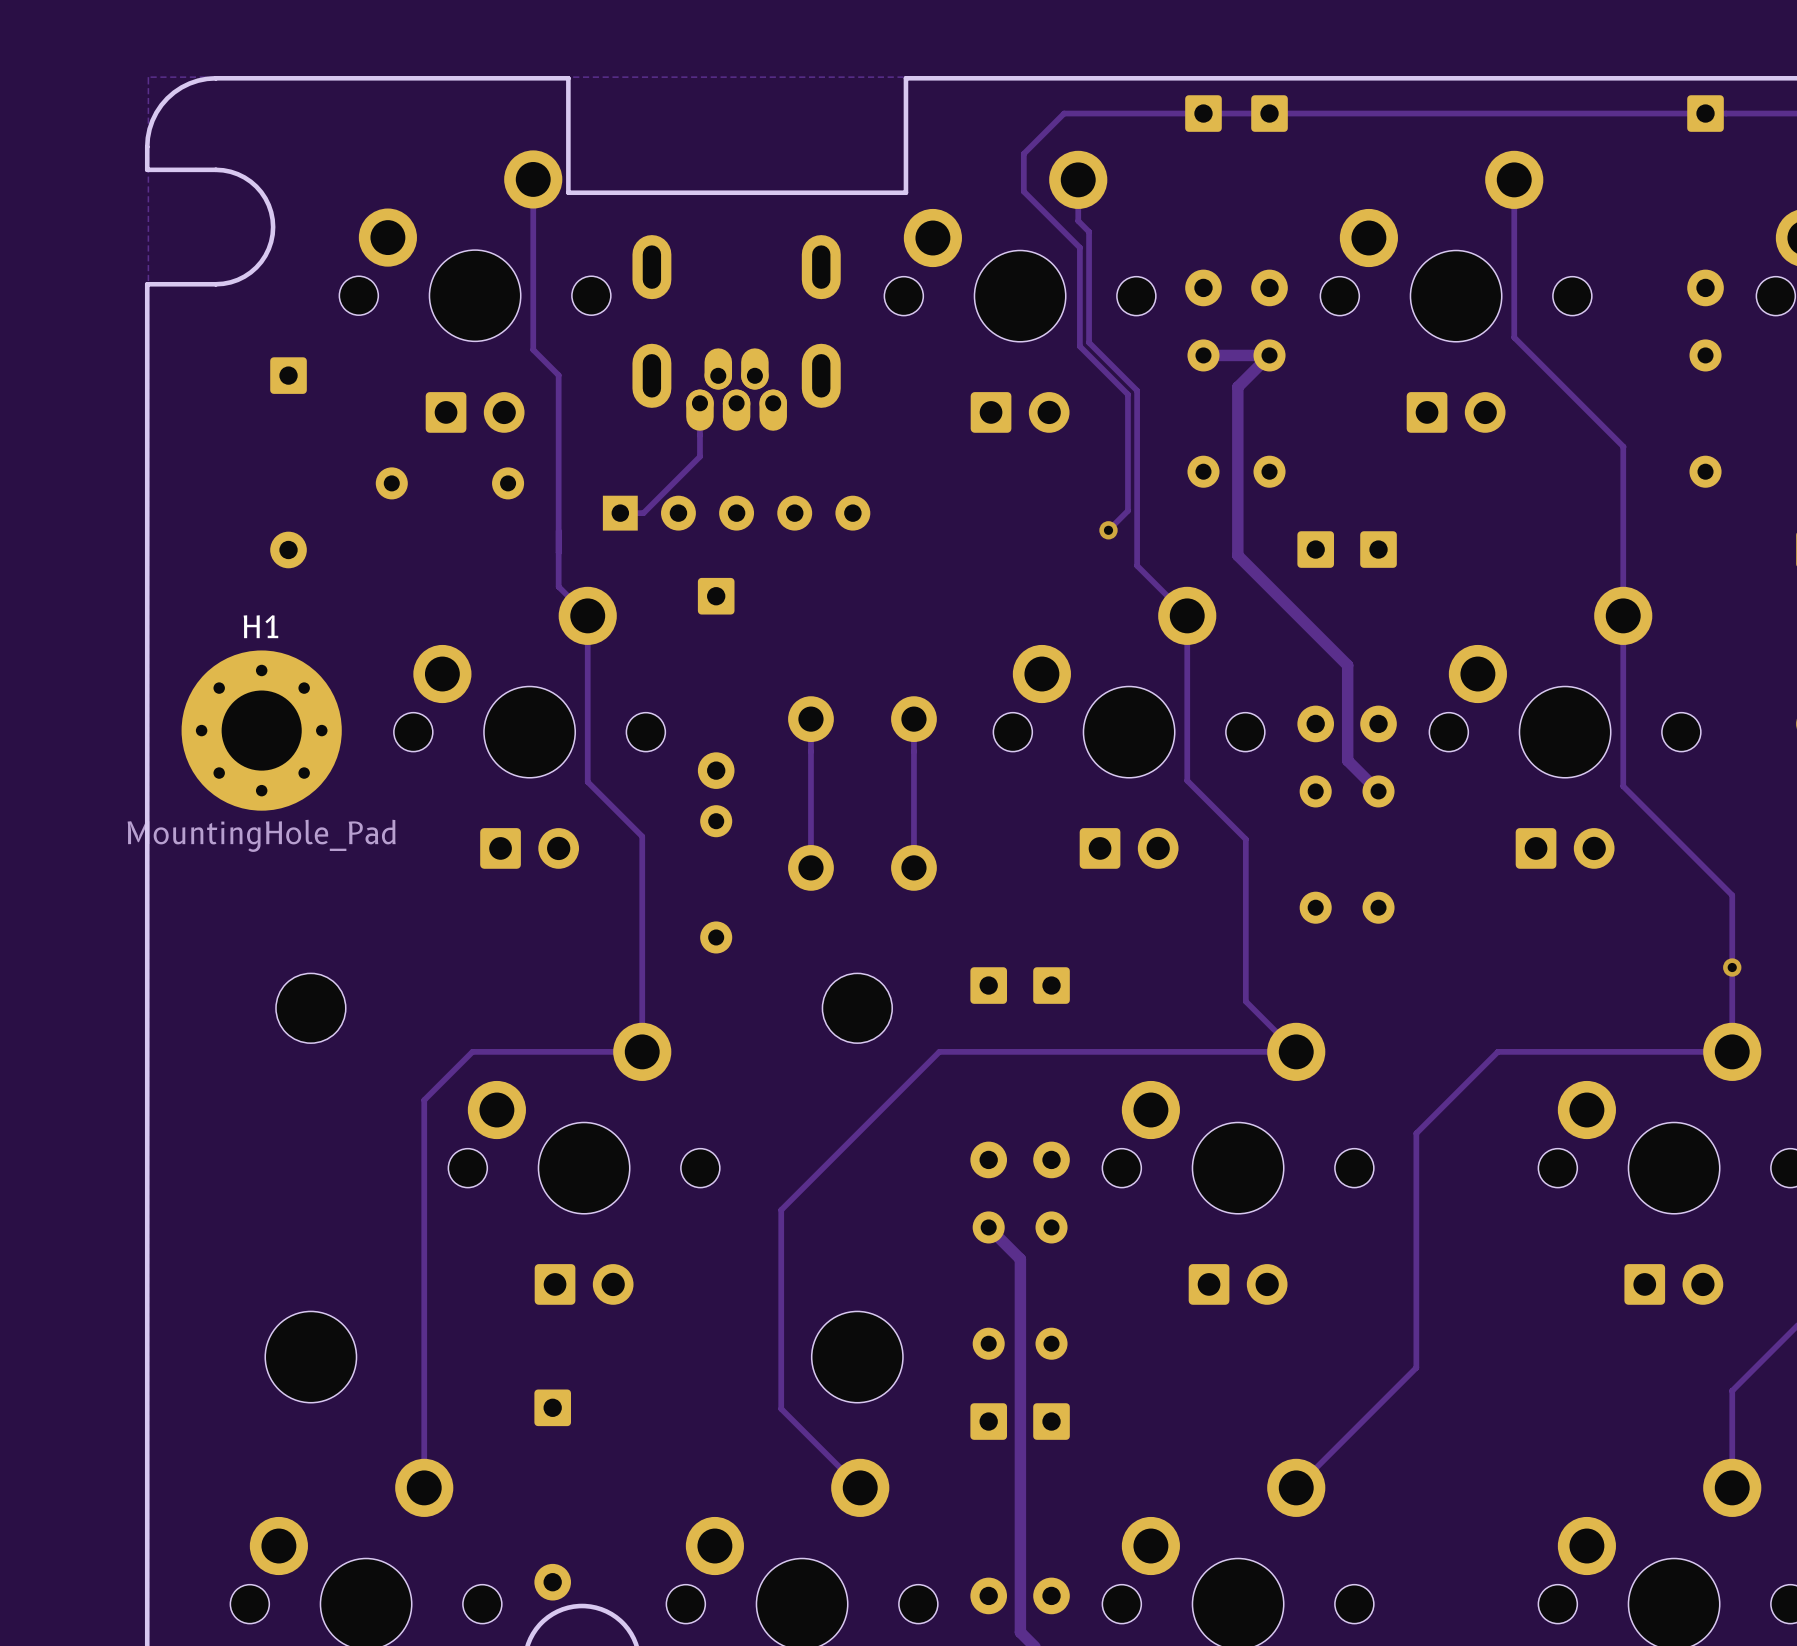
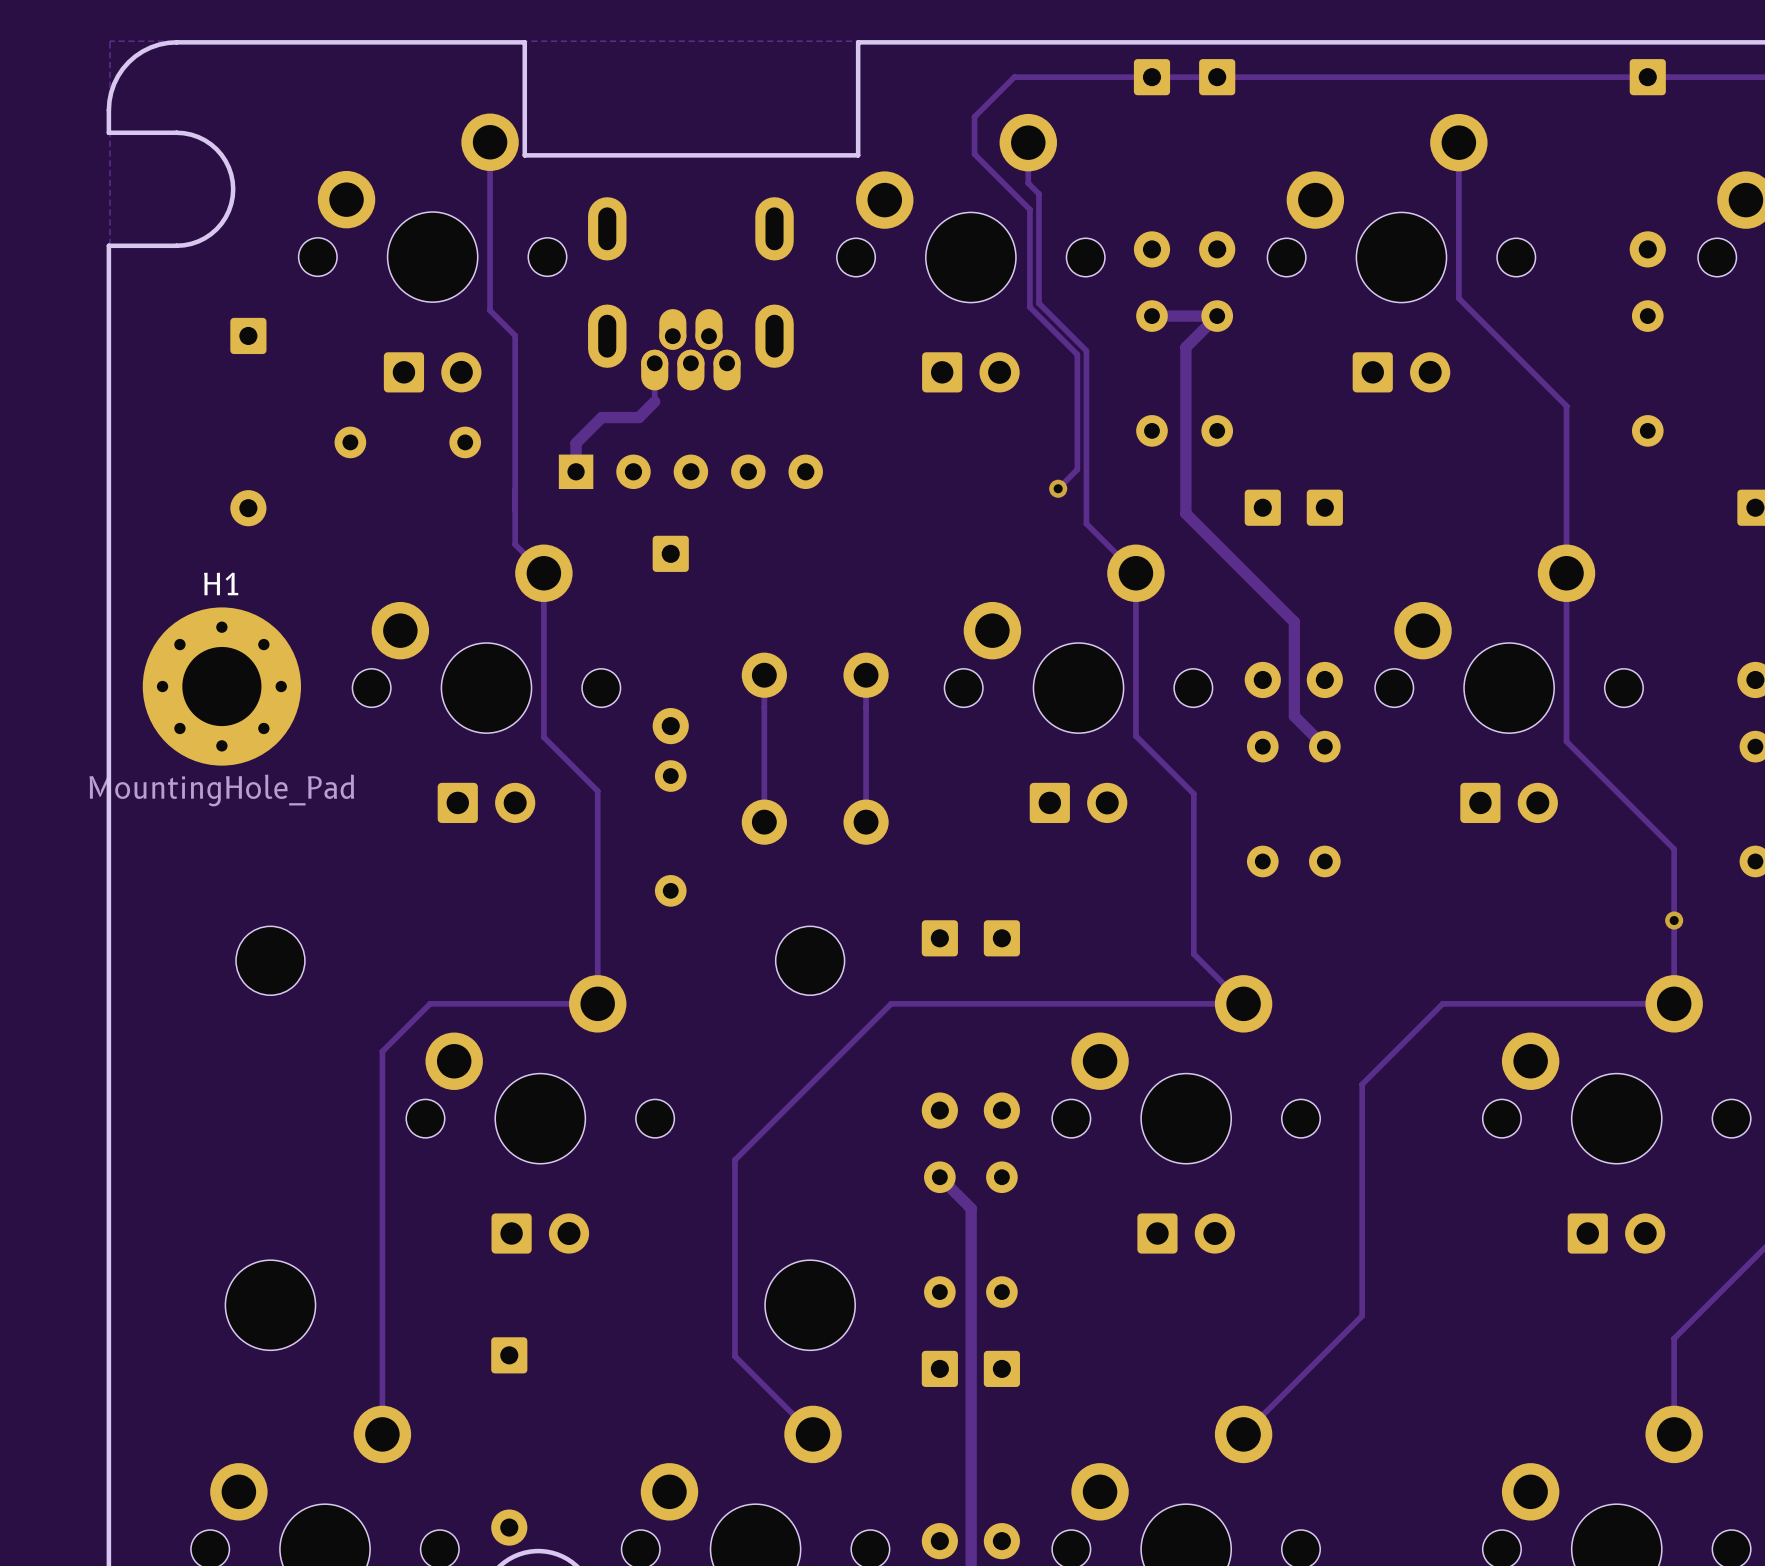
track: (699, 442) (699, 456) (643, 513) (620, 513) -> (654, 401) (638, 417) (601, 417) (576, 443) (576, 471)

